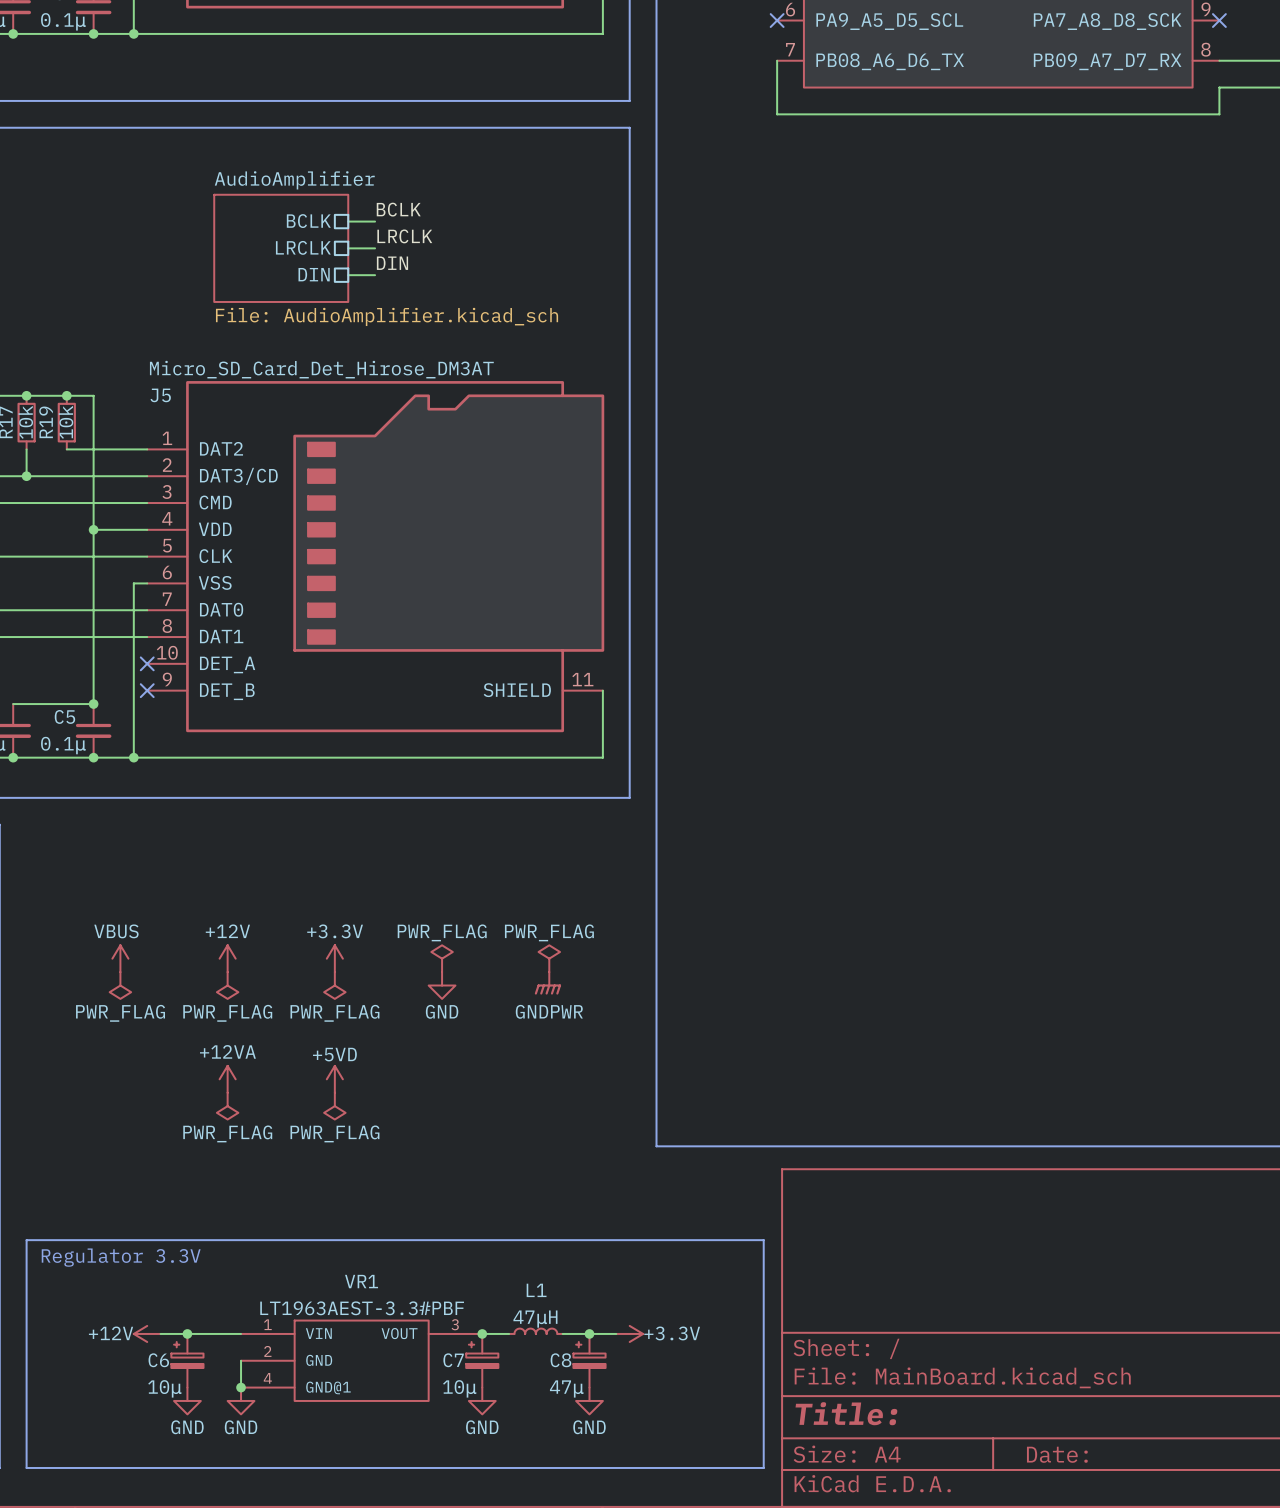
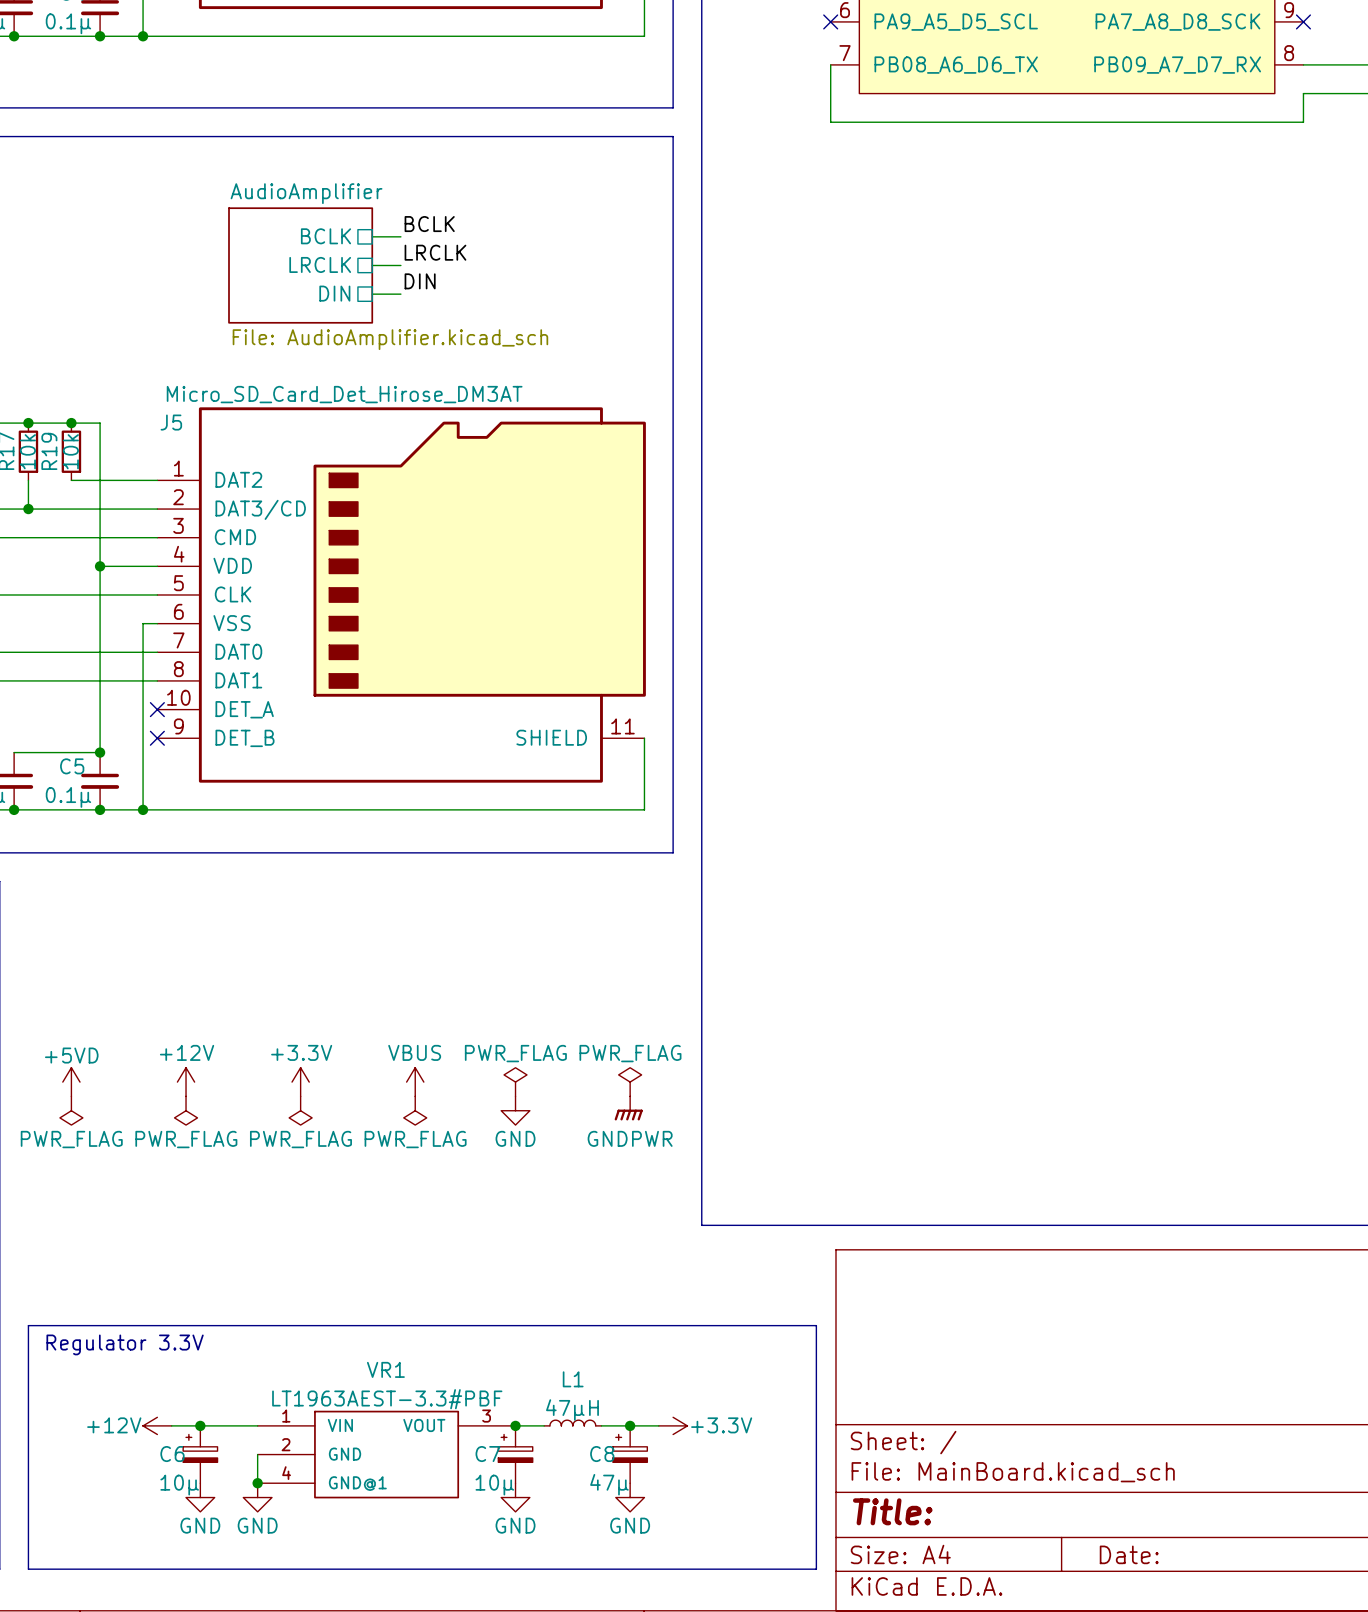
power symbol: VBUS (120, 958) -> none
power symbol position: +12V (227, 958) -> +12V (186, 1082)
power symbol position: +3.3V (334, 958) -> +3.3V (300, 1082)
power symbol: PWR_FLAG (442, 958) -> none
power symbol: PWR_FLAG (549, 958) -> none
power symbol position: GNDPWR (547, 983) -> GNDPWR (628, 1108)
power symbol: PWR_FLAG (120, 985) -> none
power symbol: PWR_FLAG (227, 985) -> none
power symbol: PWR_FLAG (334, 985) -> none
power symbol position: GND (442, 985) -> GND (515, 1110)
power symbol: none -> +5VD (71, 1082)
power symbol: none -> VBUS (415, 1082)
power symbol: none -> PWR_FLAG (515, 1082)
power symbol: none -> PWR_FLAG (630, 1082)
power symbol: none -> PWR_FLAG (71, 1110)
power symbol: none -> PWR_FLAG (186, 1110)
power symbol: none -> PWR_FLAG (300, 1110)
power symbol: none -> PWR_FLAG (415, 1110)
power symbol: +12VA (227, 1079) -> none
power symbol: +5VD (334, 1079) -> none
power symbol: PWR_FLAG (227, 1106) -> none
power symbol: PWR_FLAG (334, 1106) -> none

